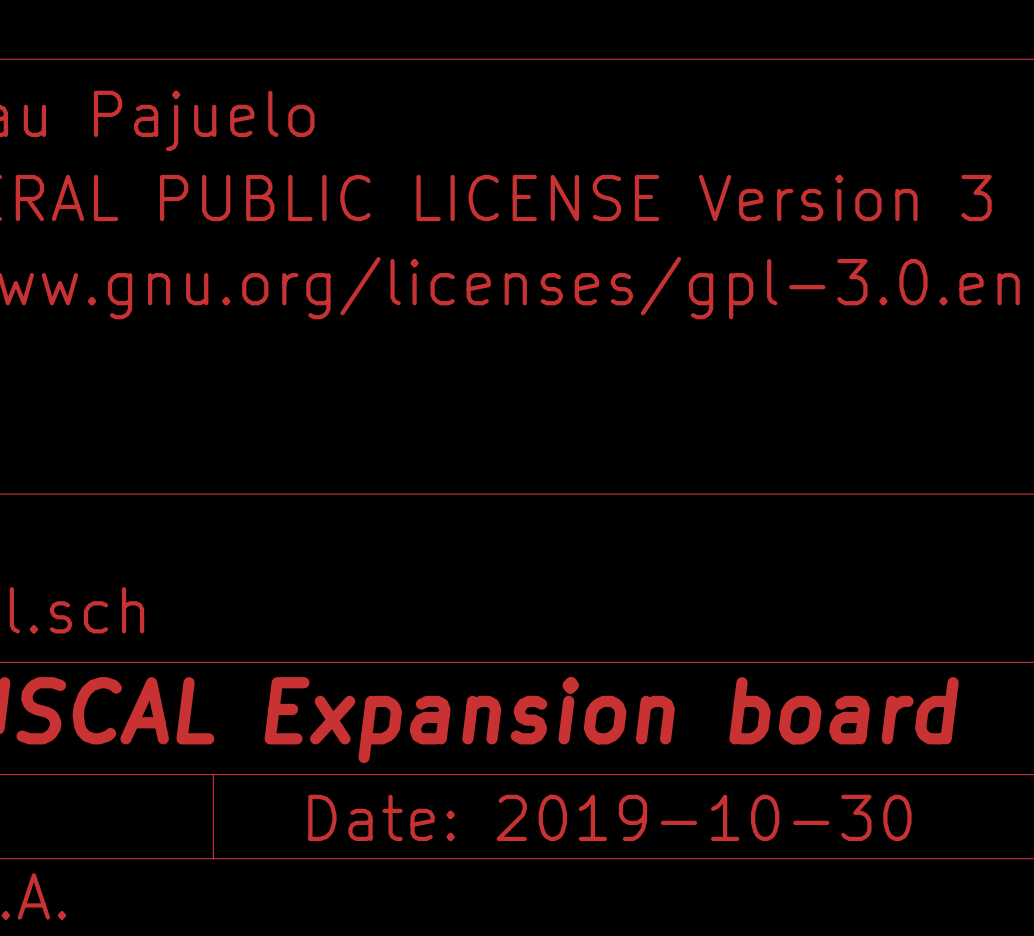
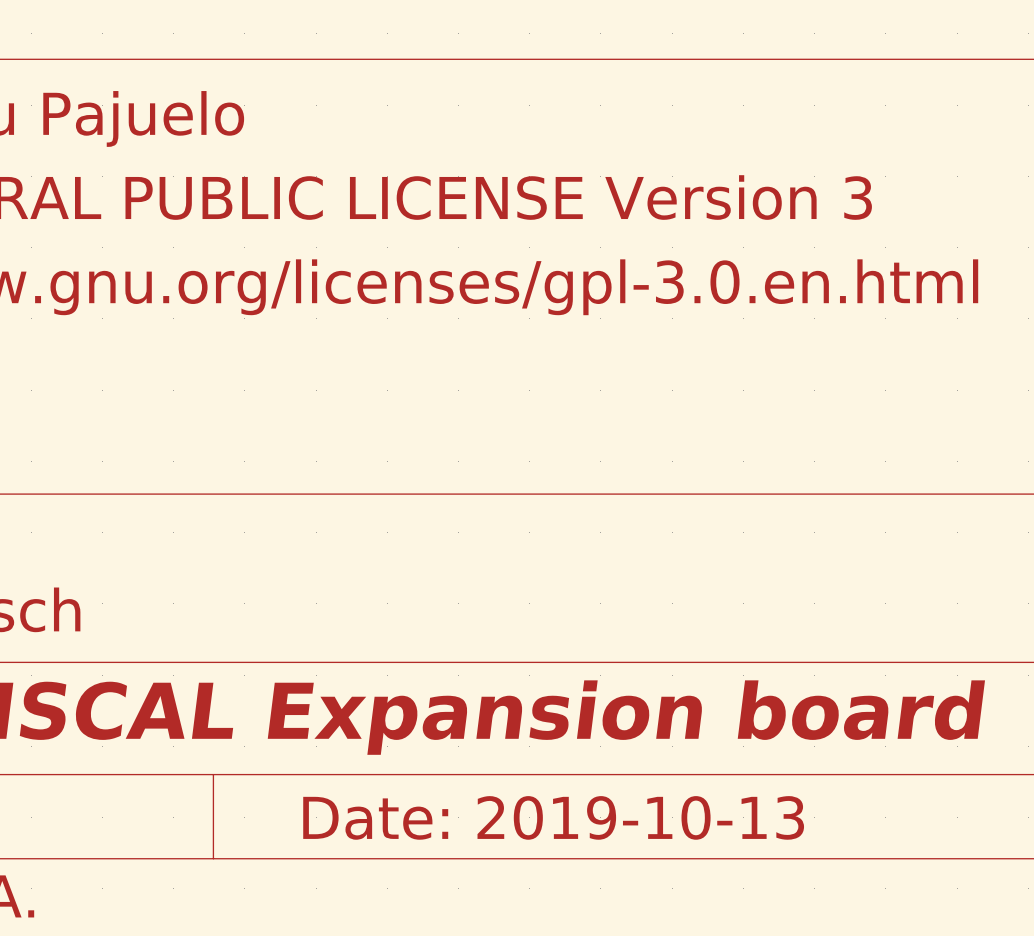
title block: Date: 2019-10-30 (609, 817) -> Date: 2019-10-13 (553, 817)

